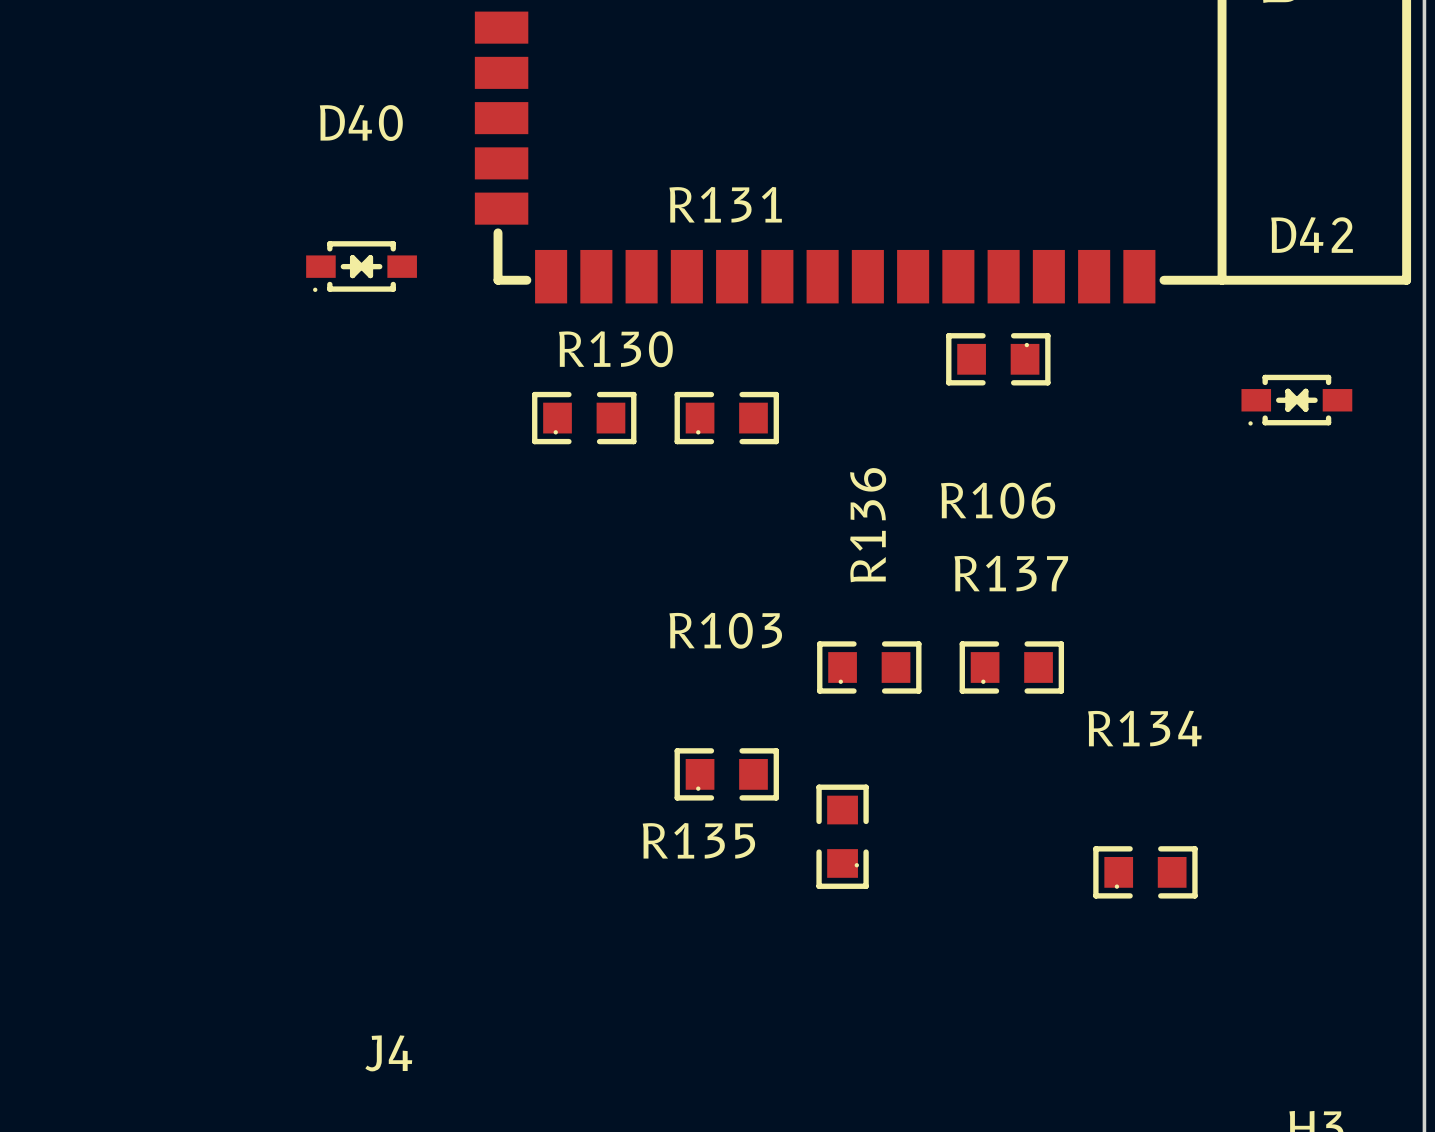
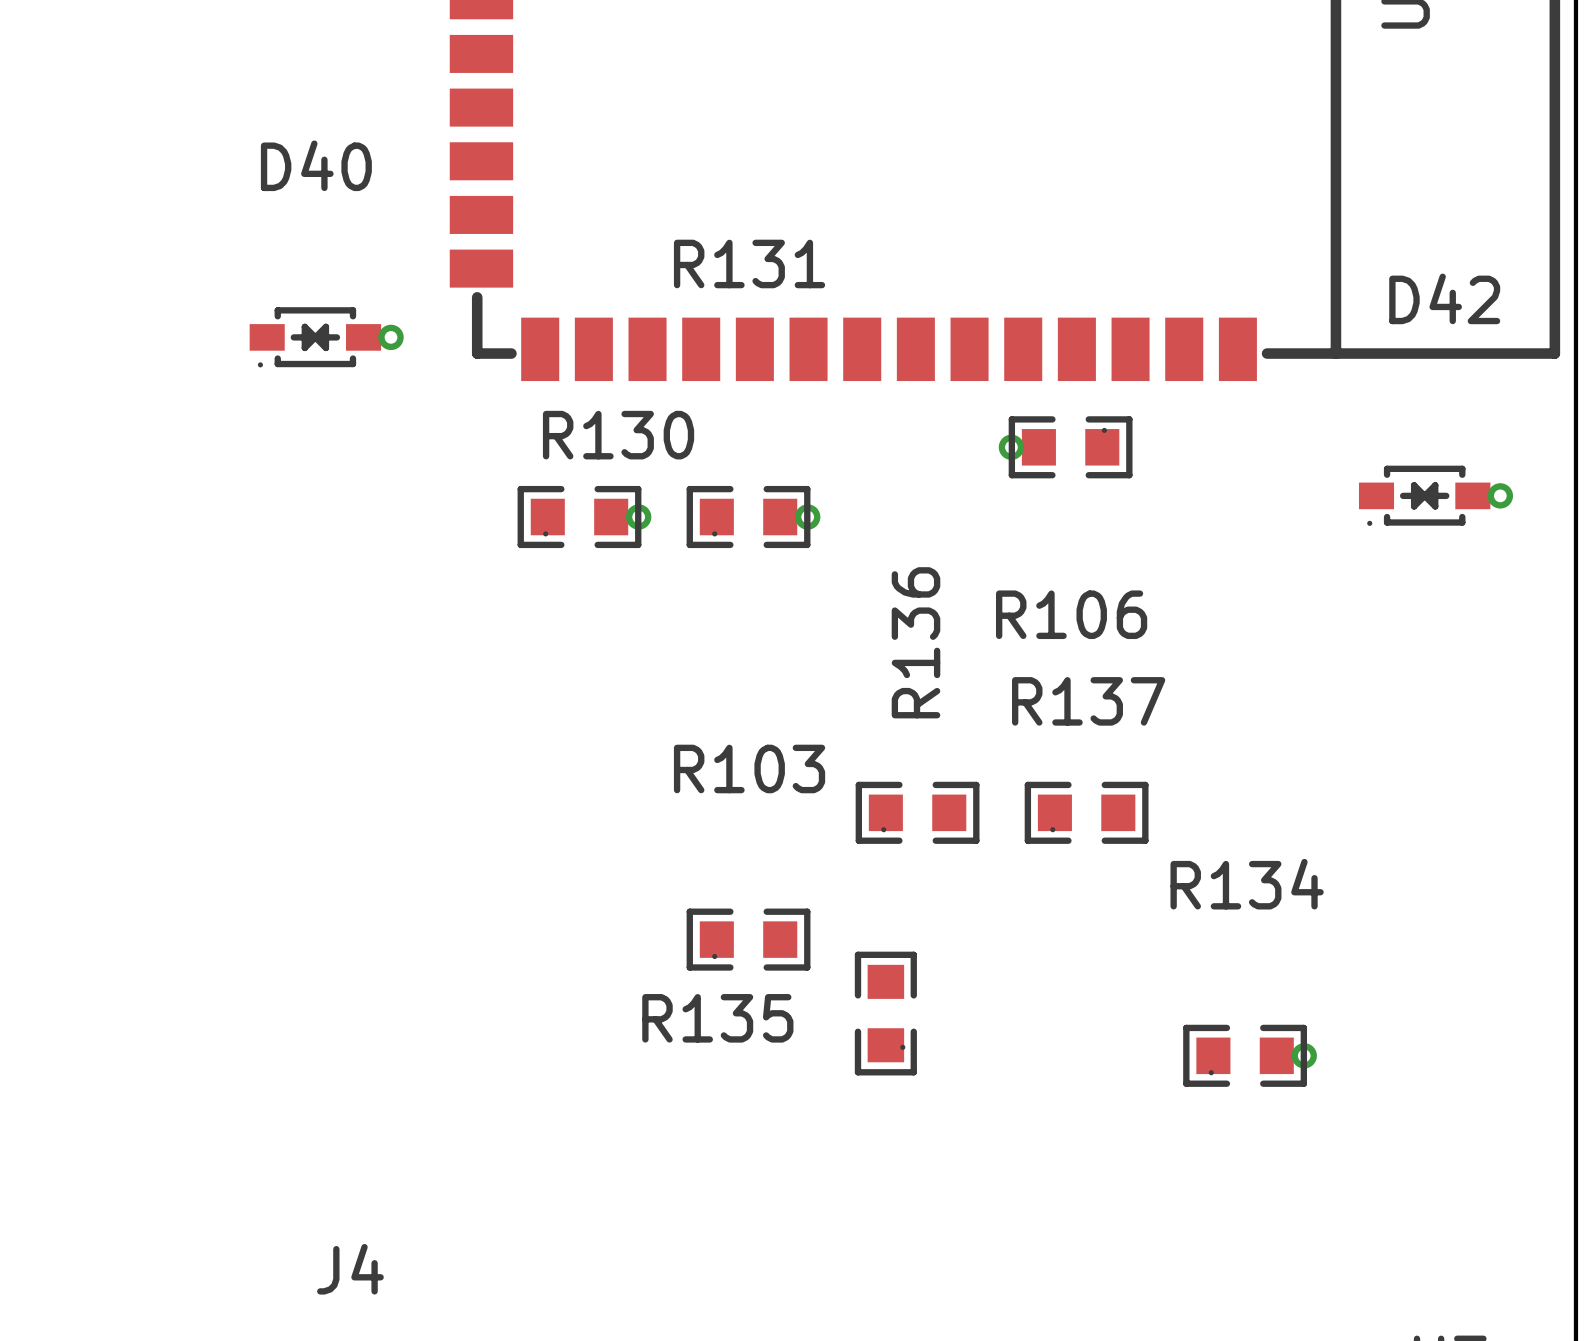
via: none -> (391, 337)
via: none -> (1011, 447)
via: none -> (1500, 495)
via: none -> (638, 517)
via: none -> (807, 517)
via: none -> (1304, 1055)

